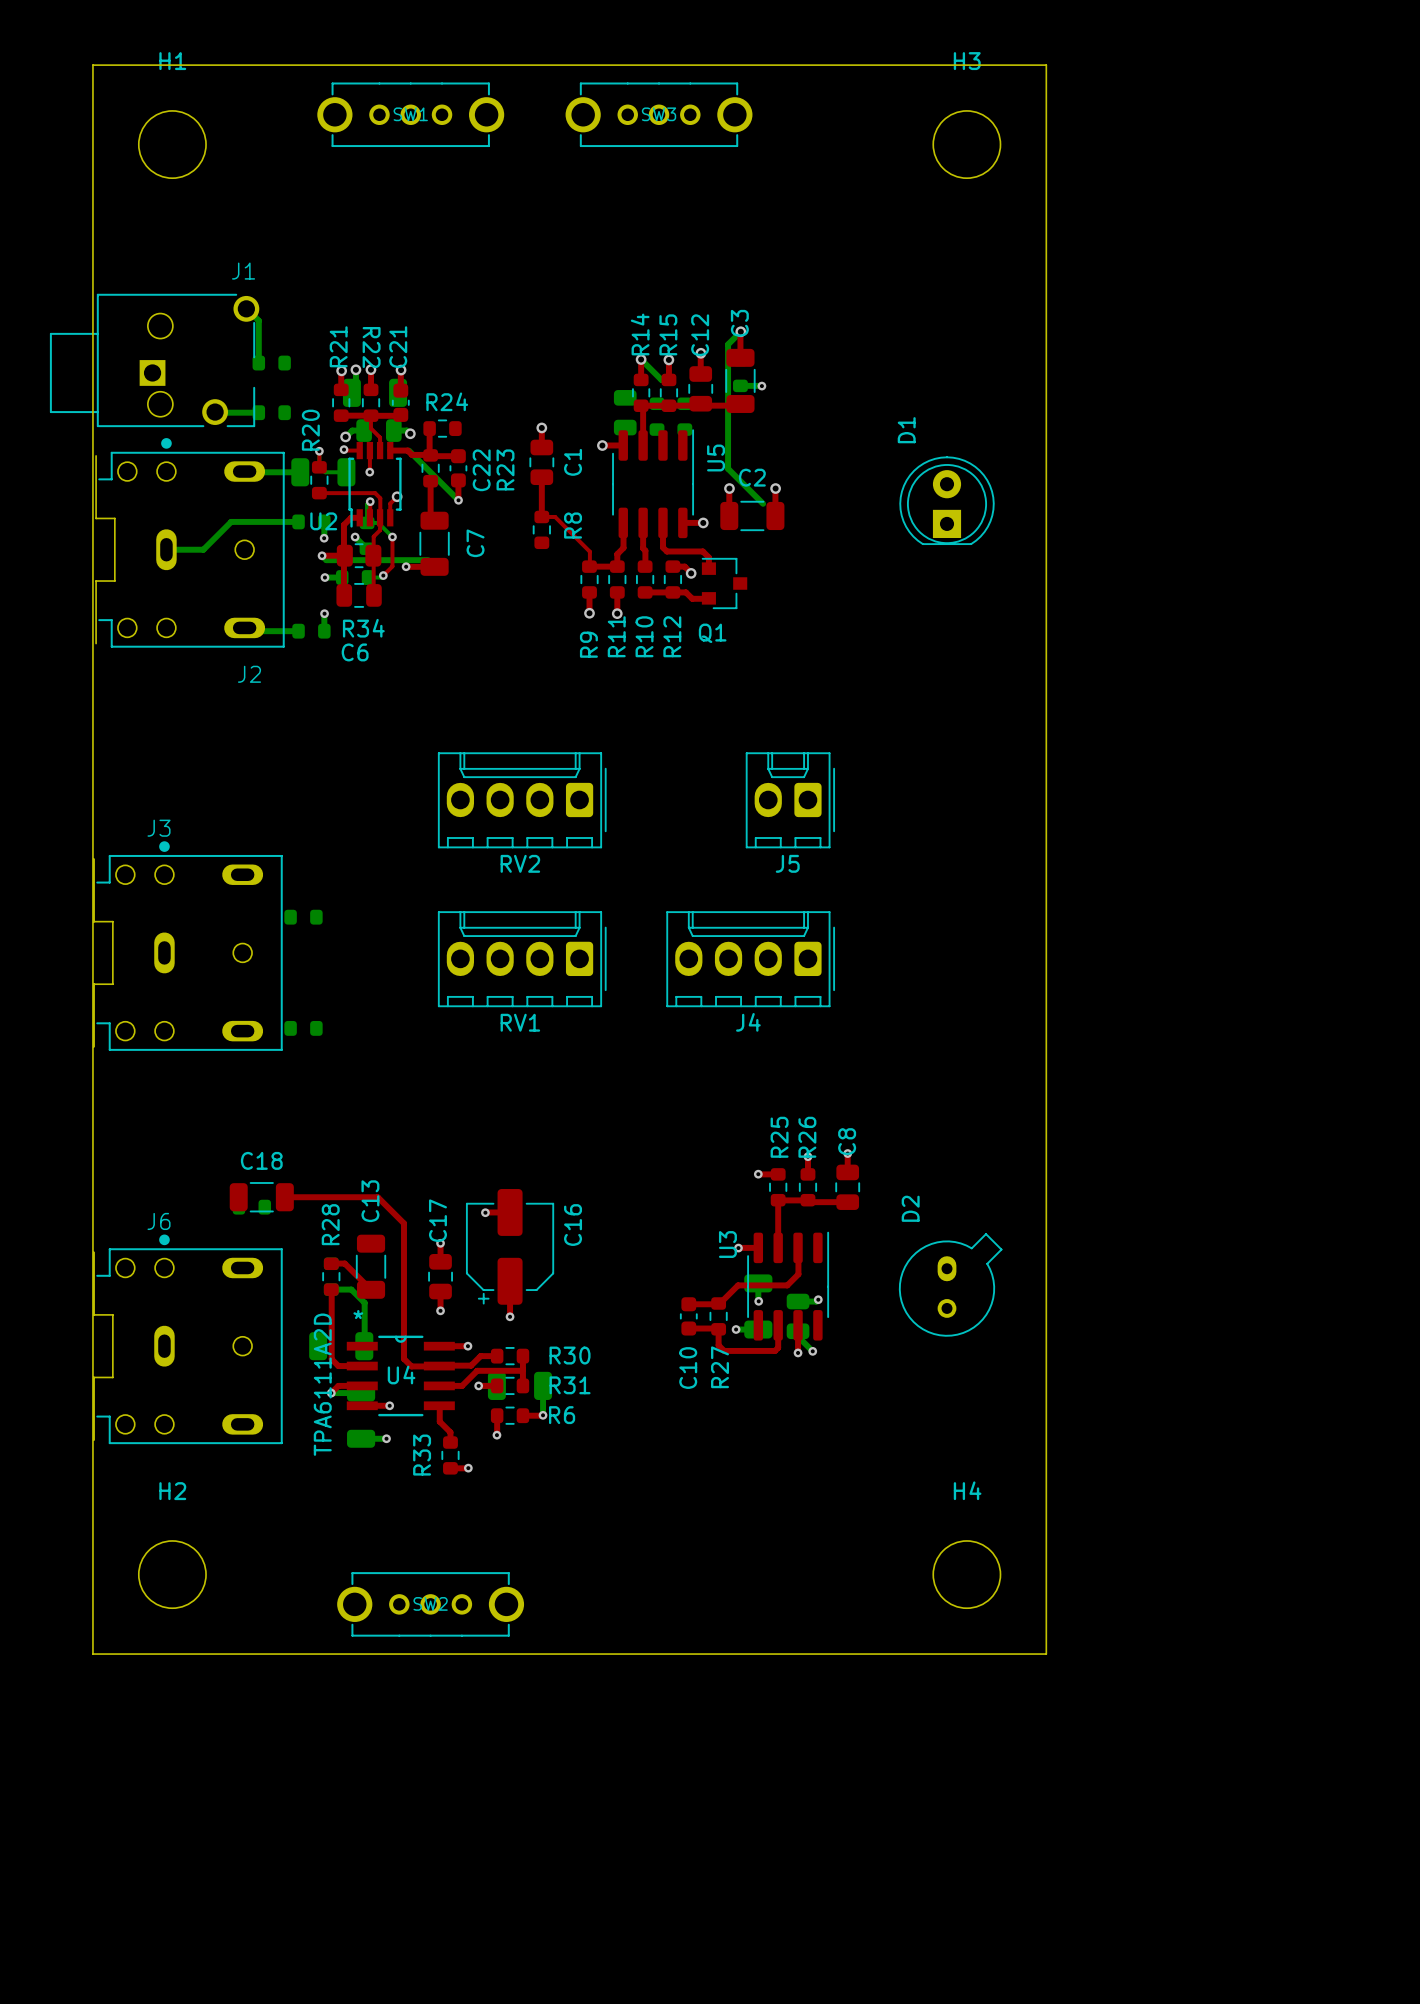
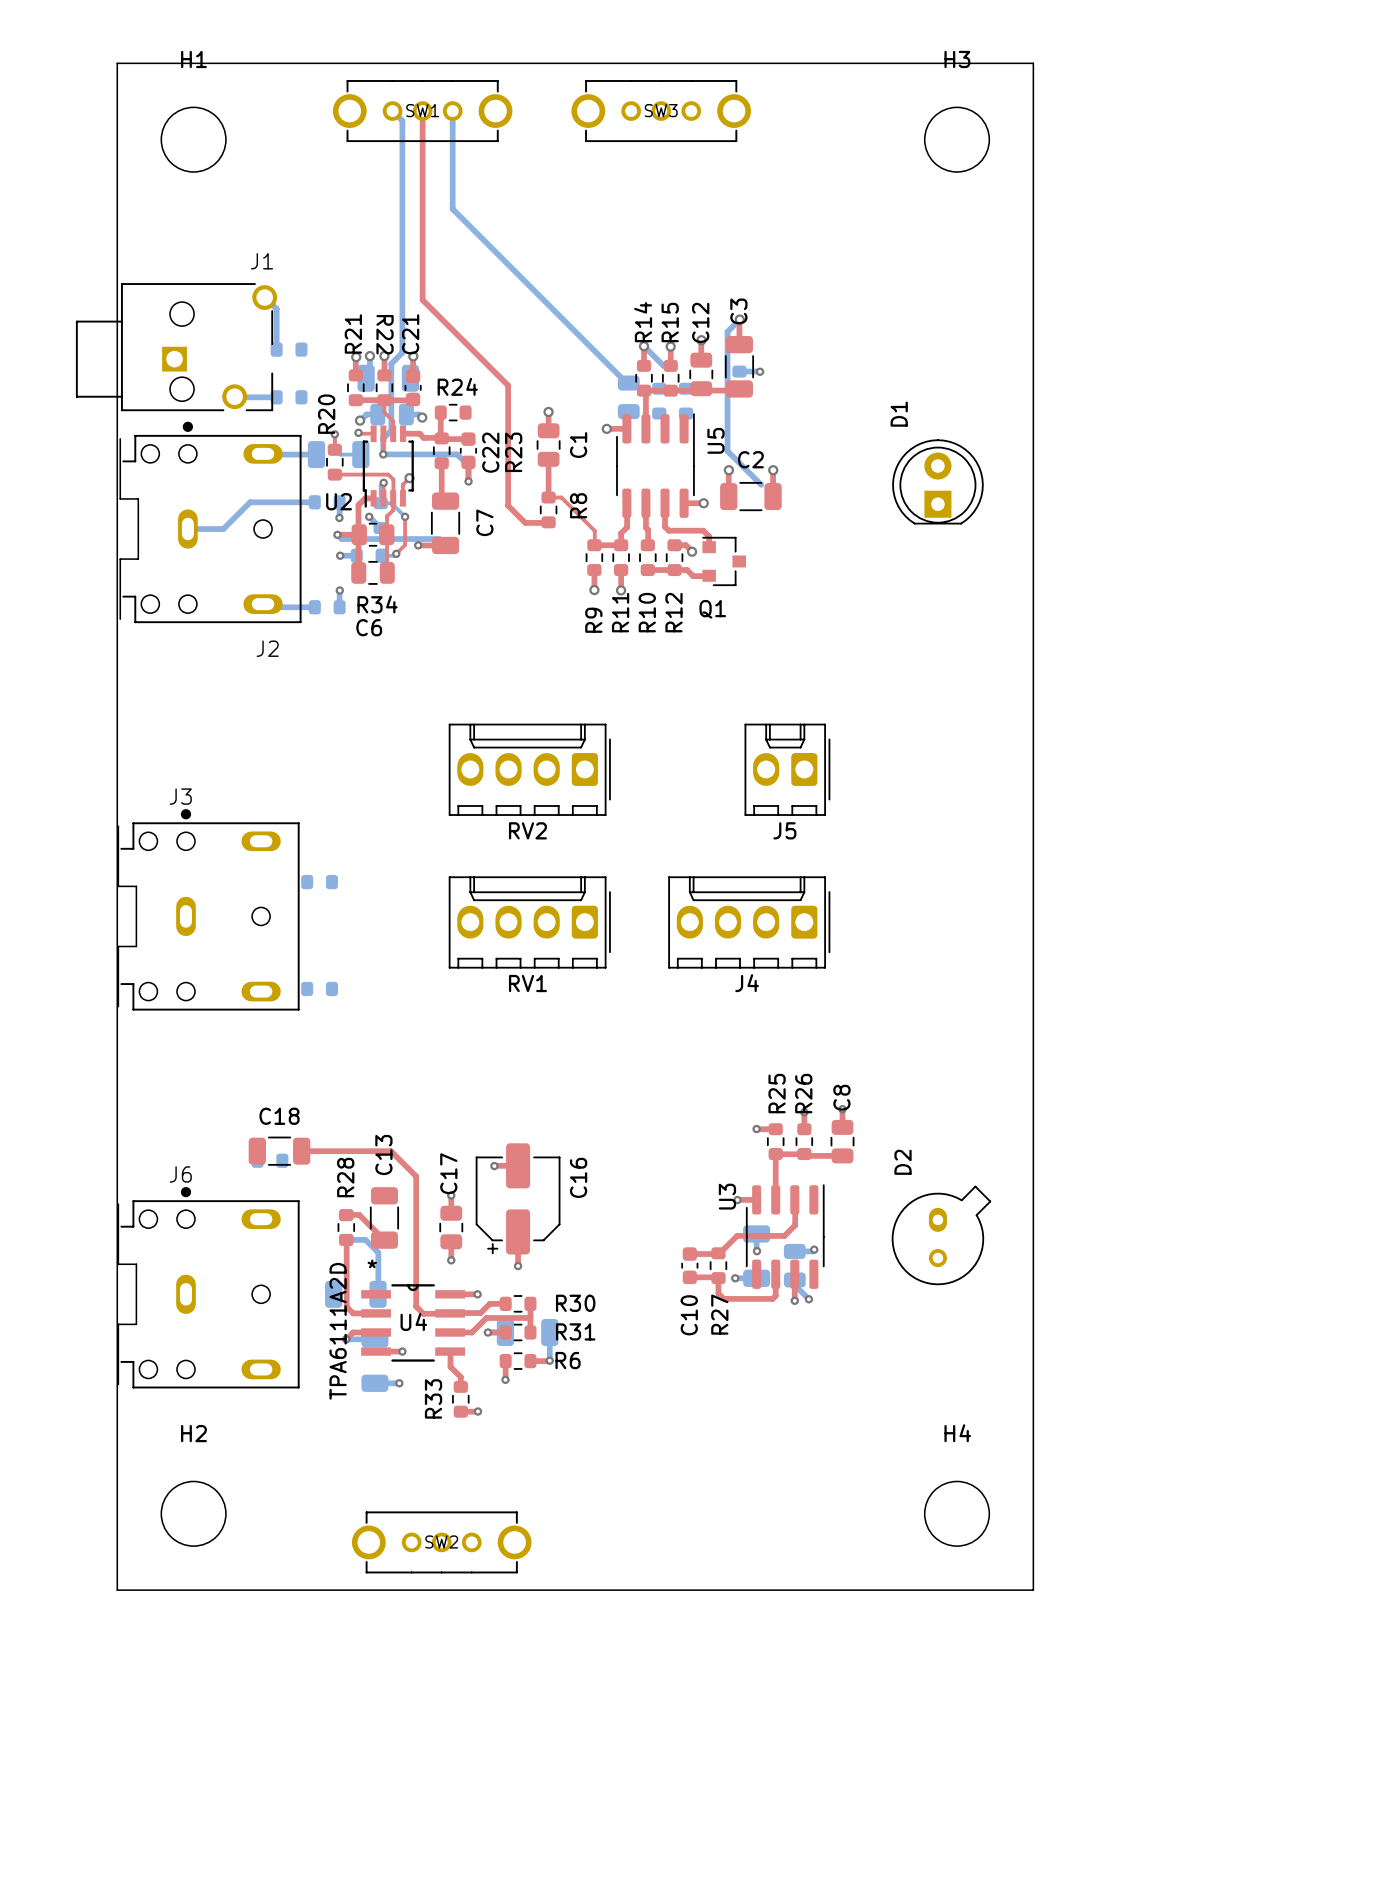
top track: none -> (422, 111) (422, 299) (508, 385) (508, 505) (525, 522) (548, 523)
bottom track: none -> (452, 111) (452, 209) (626, 382)
bottom track: (408, 450) (458, 500) -> (392, 111) (402, 120) (402, 352) (391, 363) (391, 430) (383, 438) (383, 454) (457, 454) (468, 465) (468, 481)

